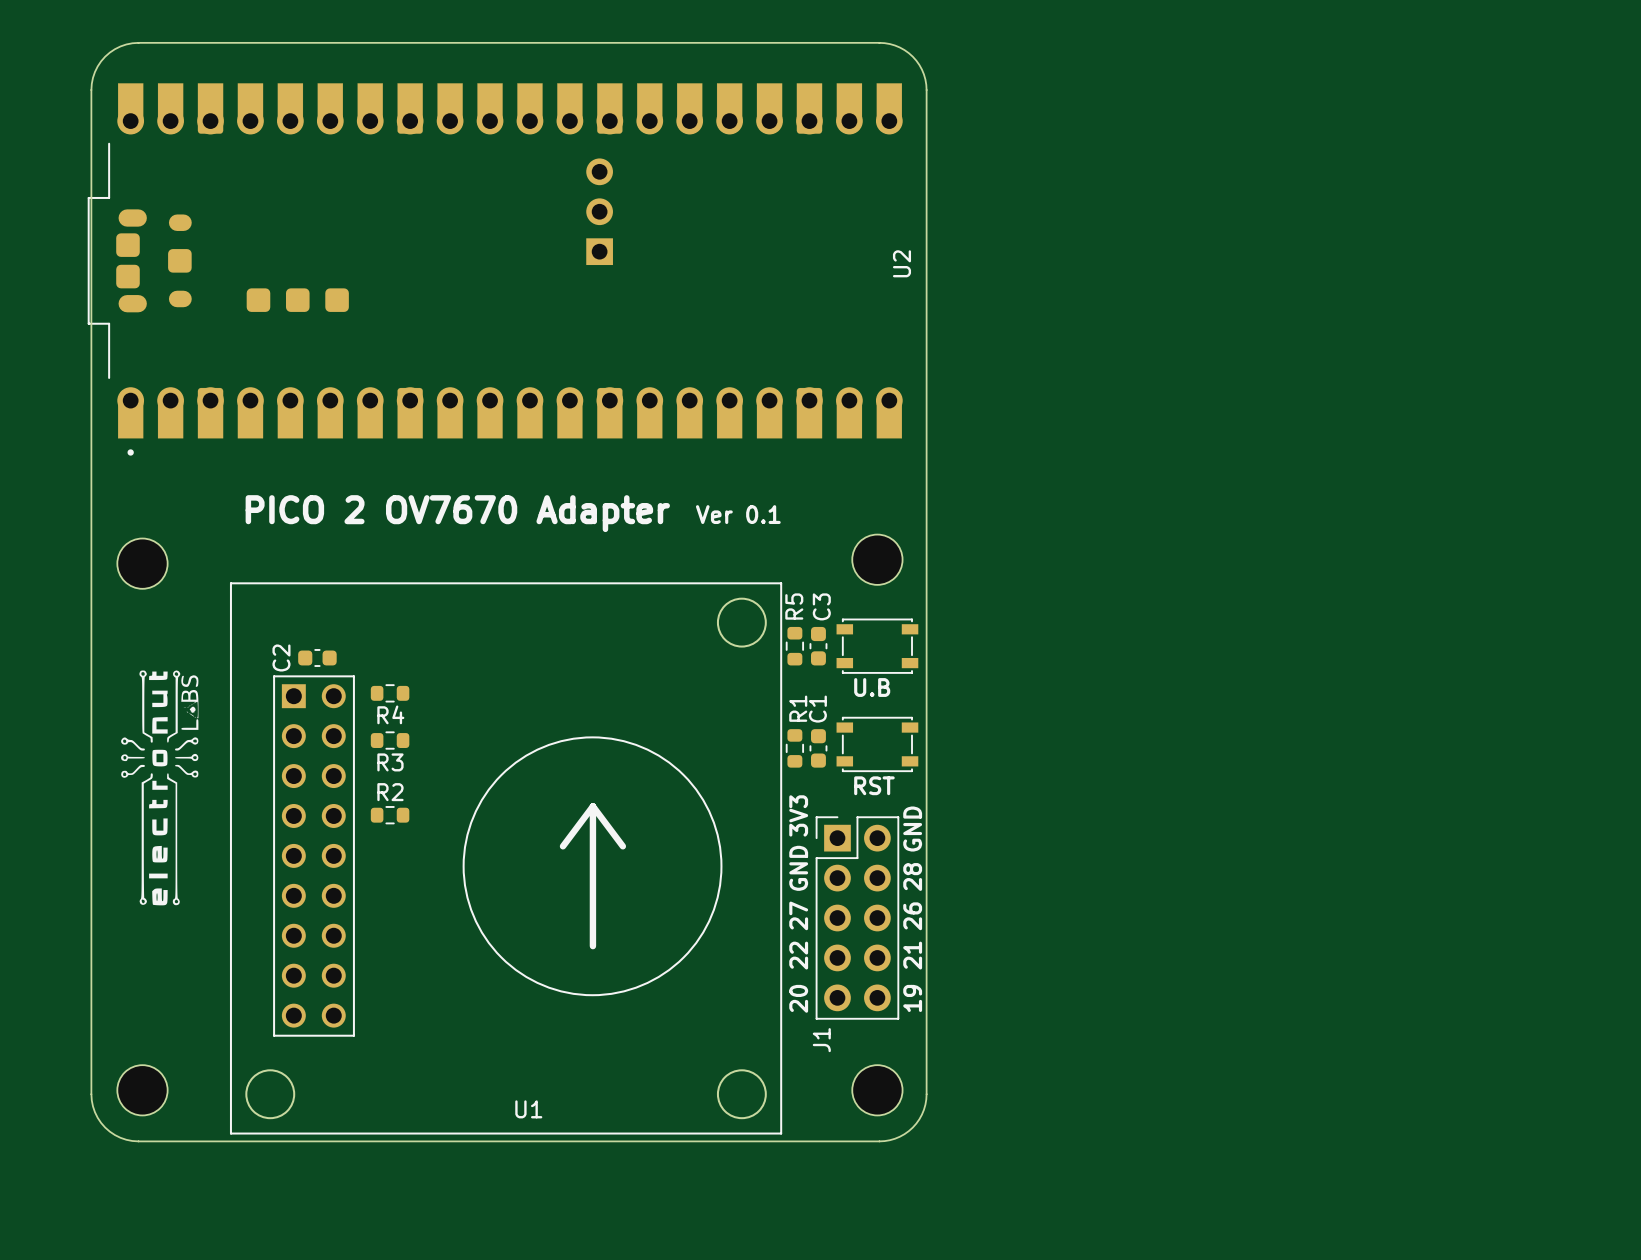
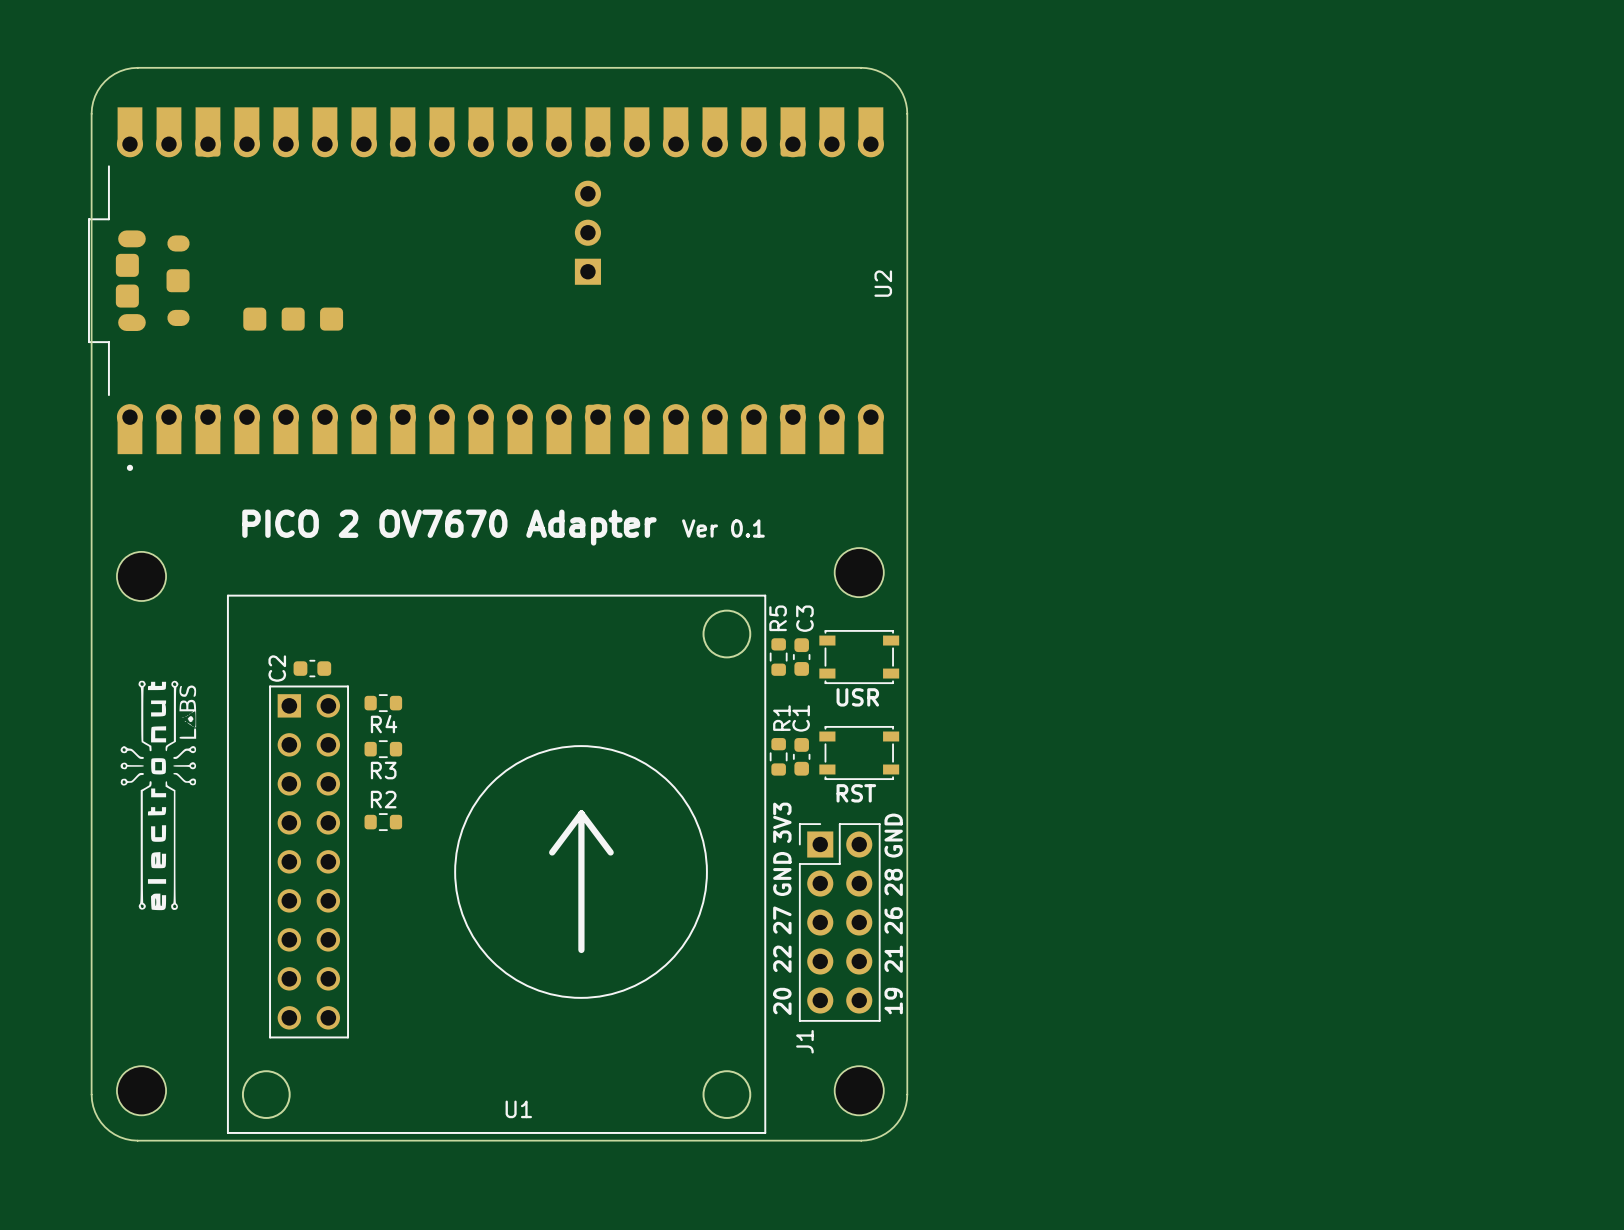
text: U.B (872, 687) -> USR (857, 697)

